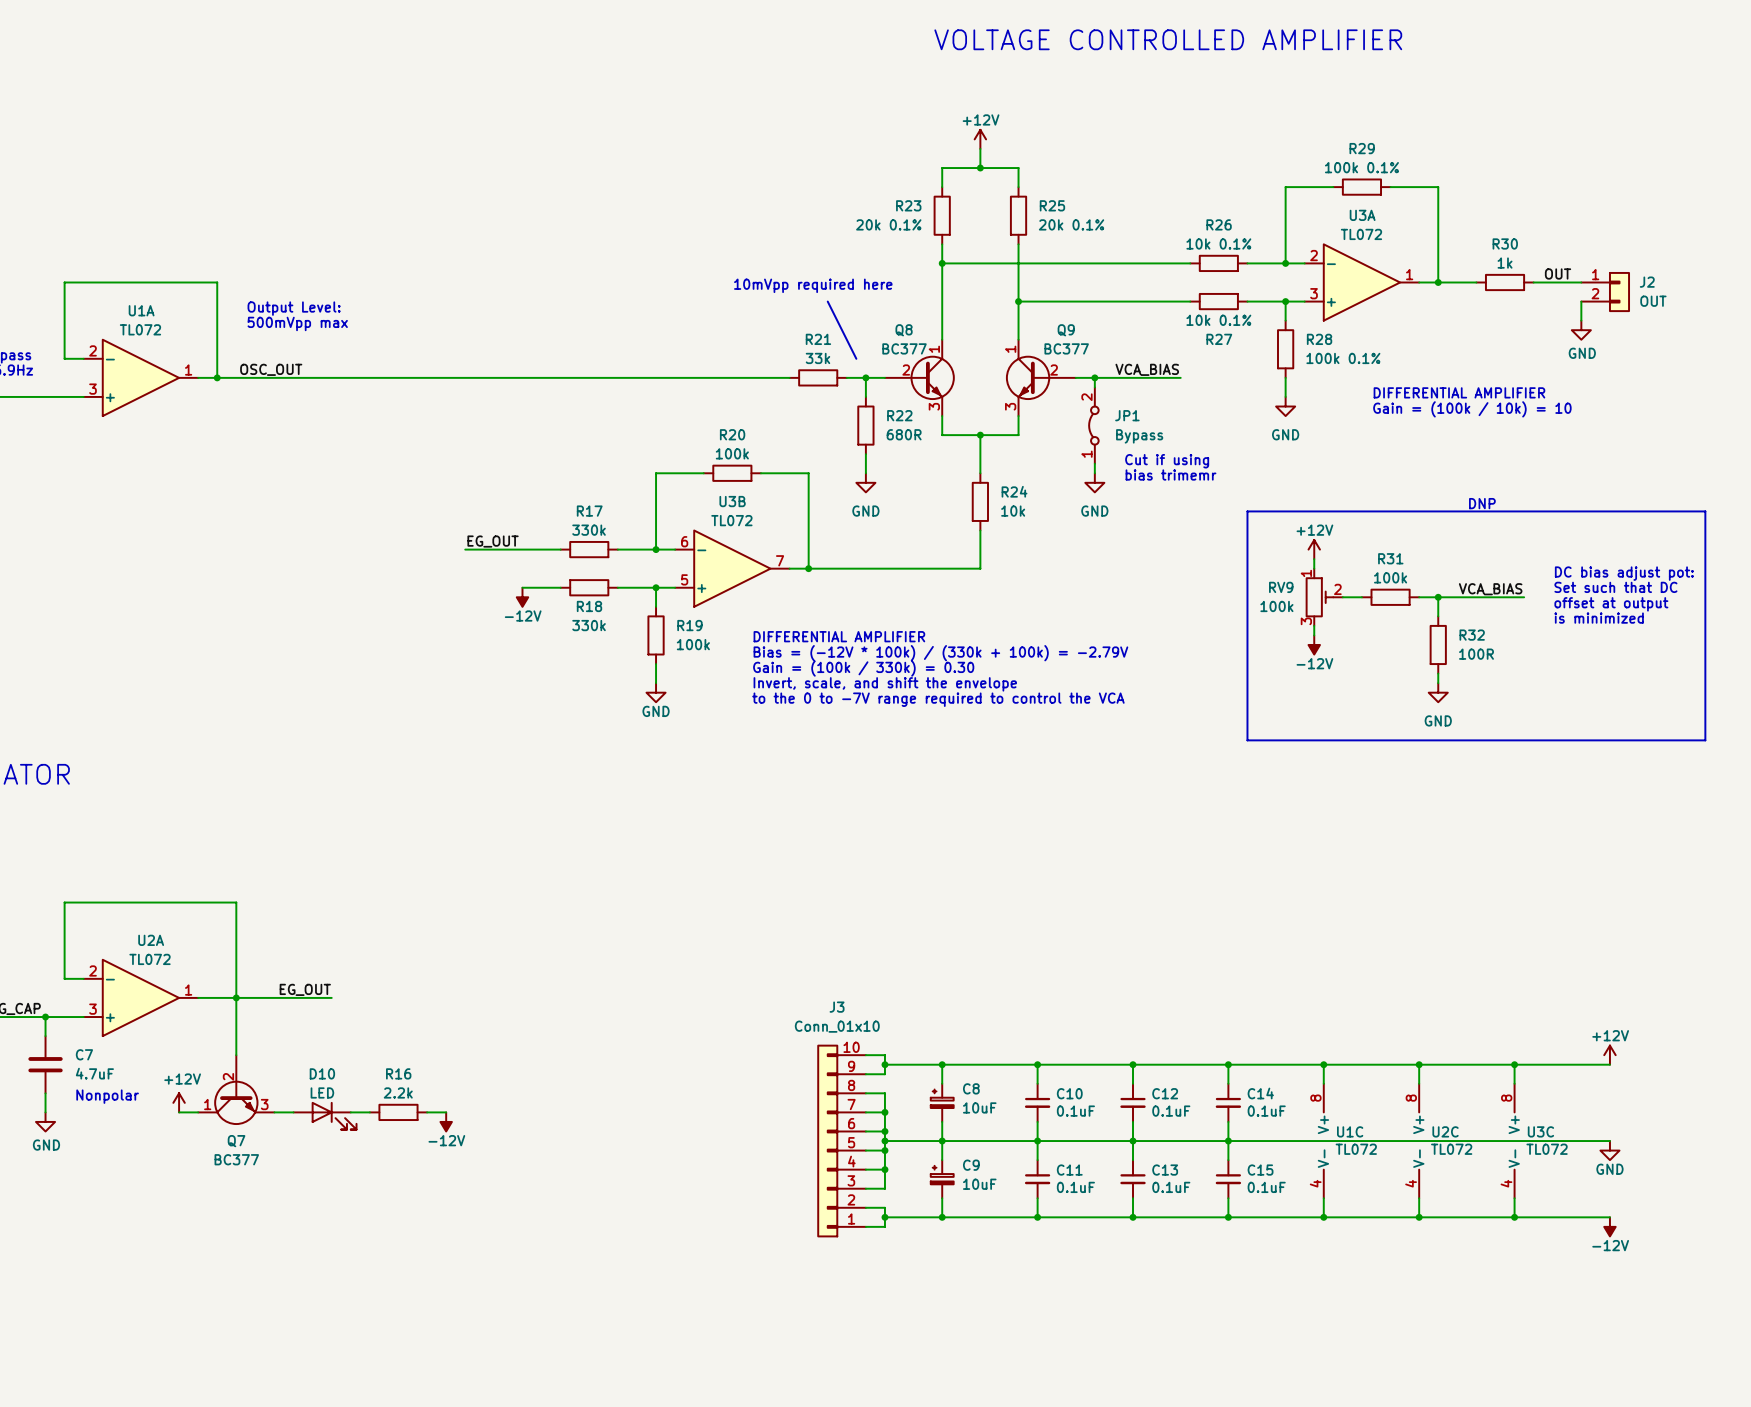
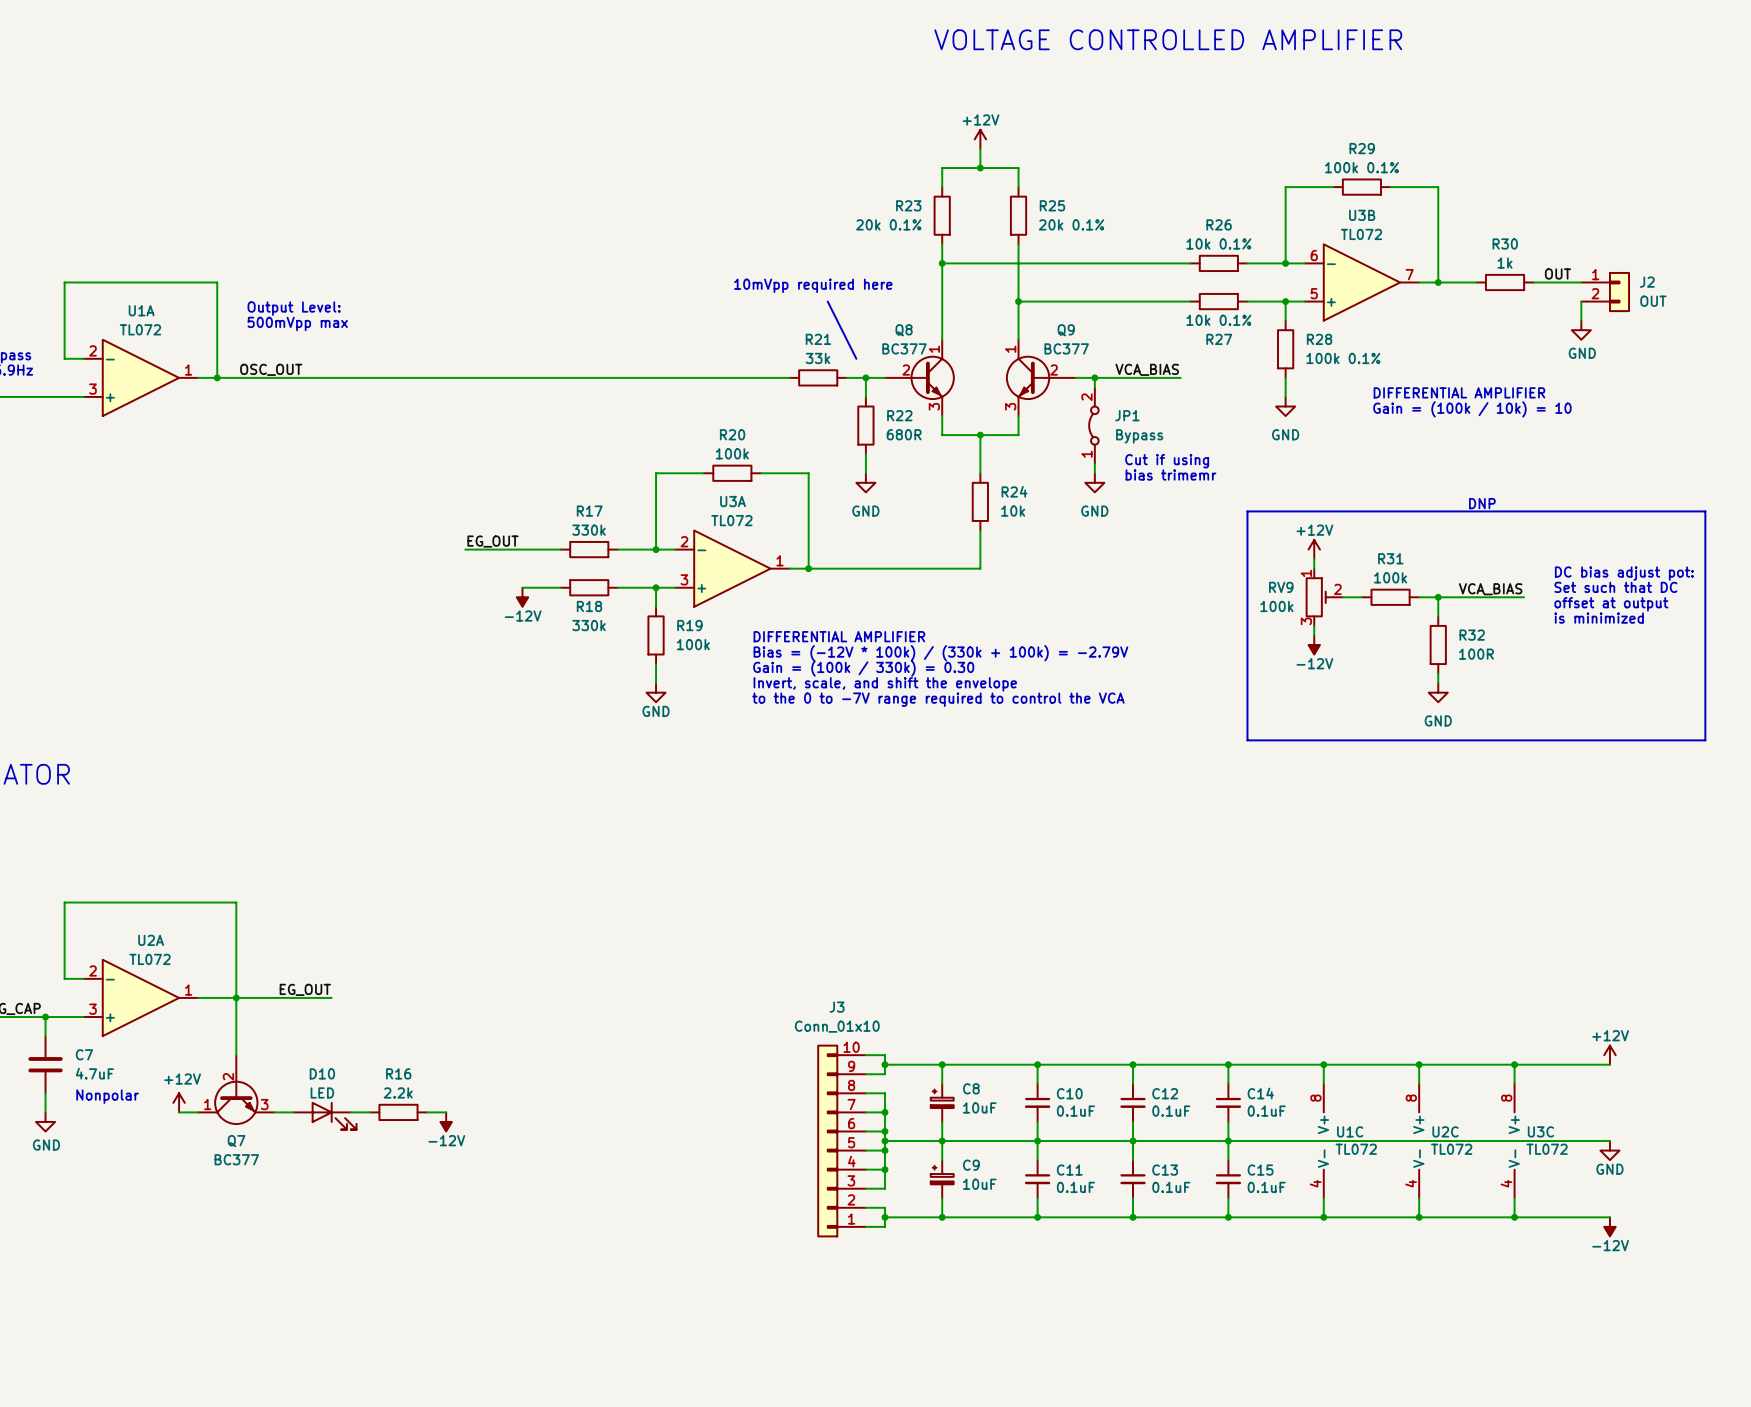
U3A position: (1361, 282) -> (732, 568)
U3B position: (732, 568) -> (1361, 282)

